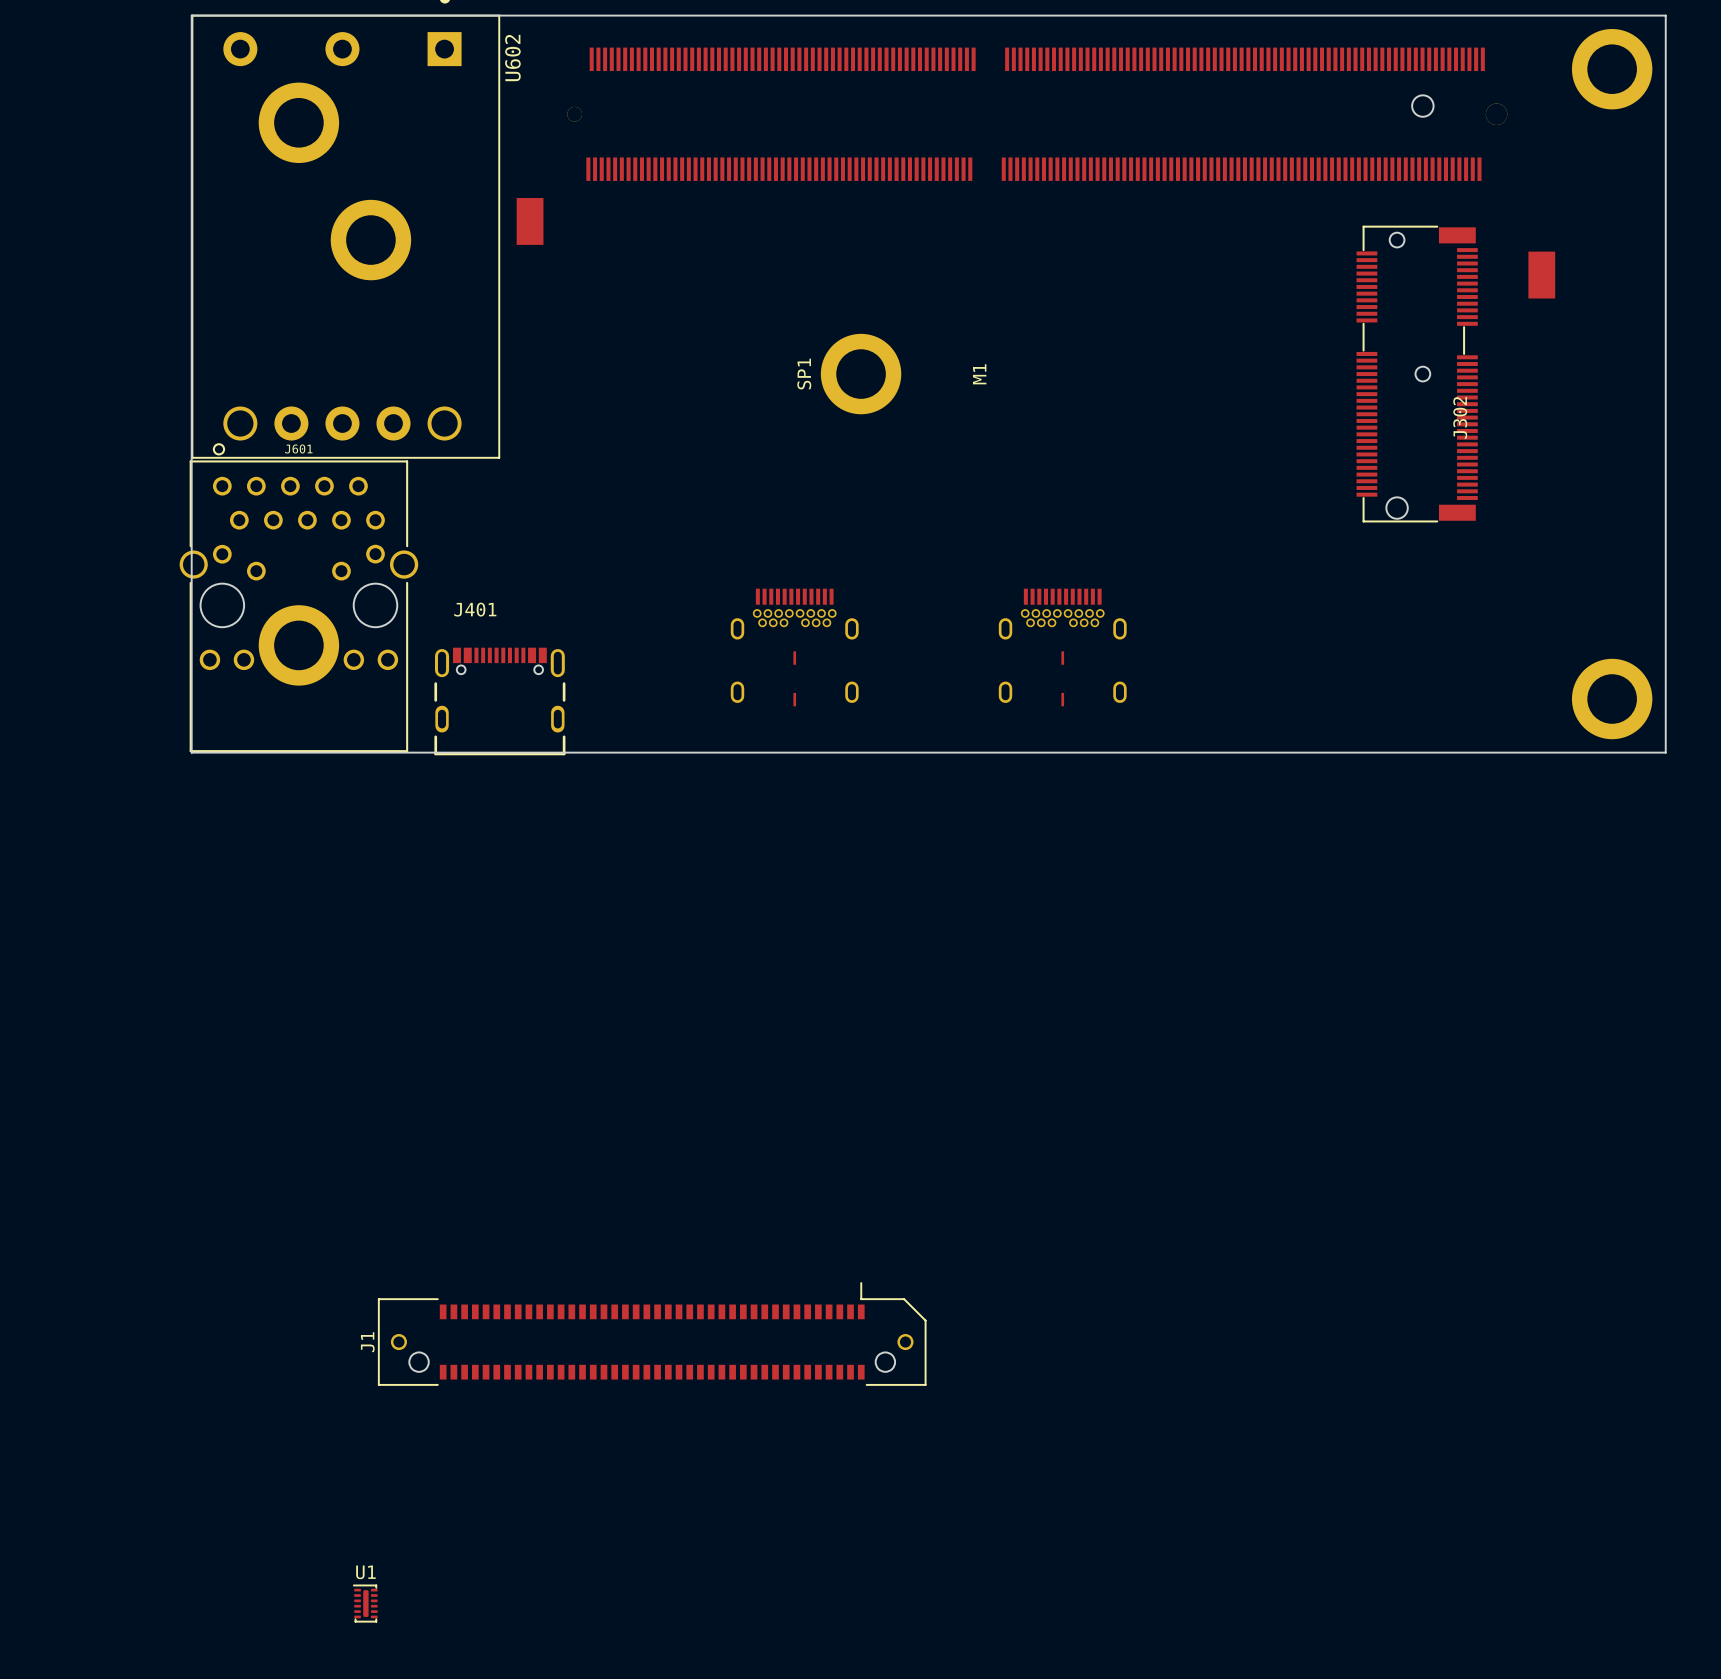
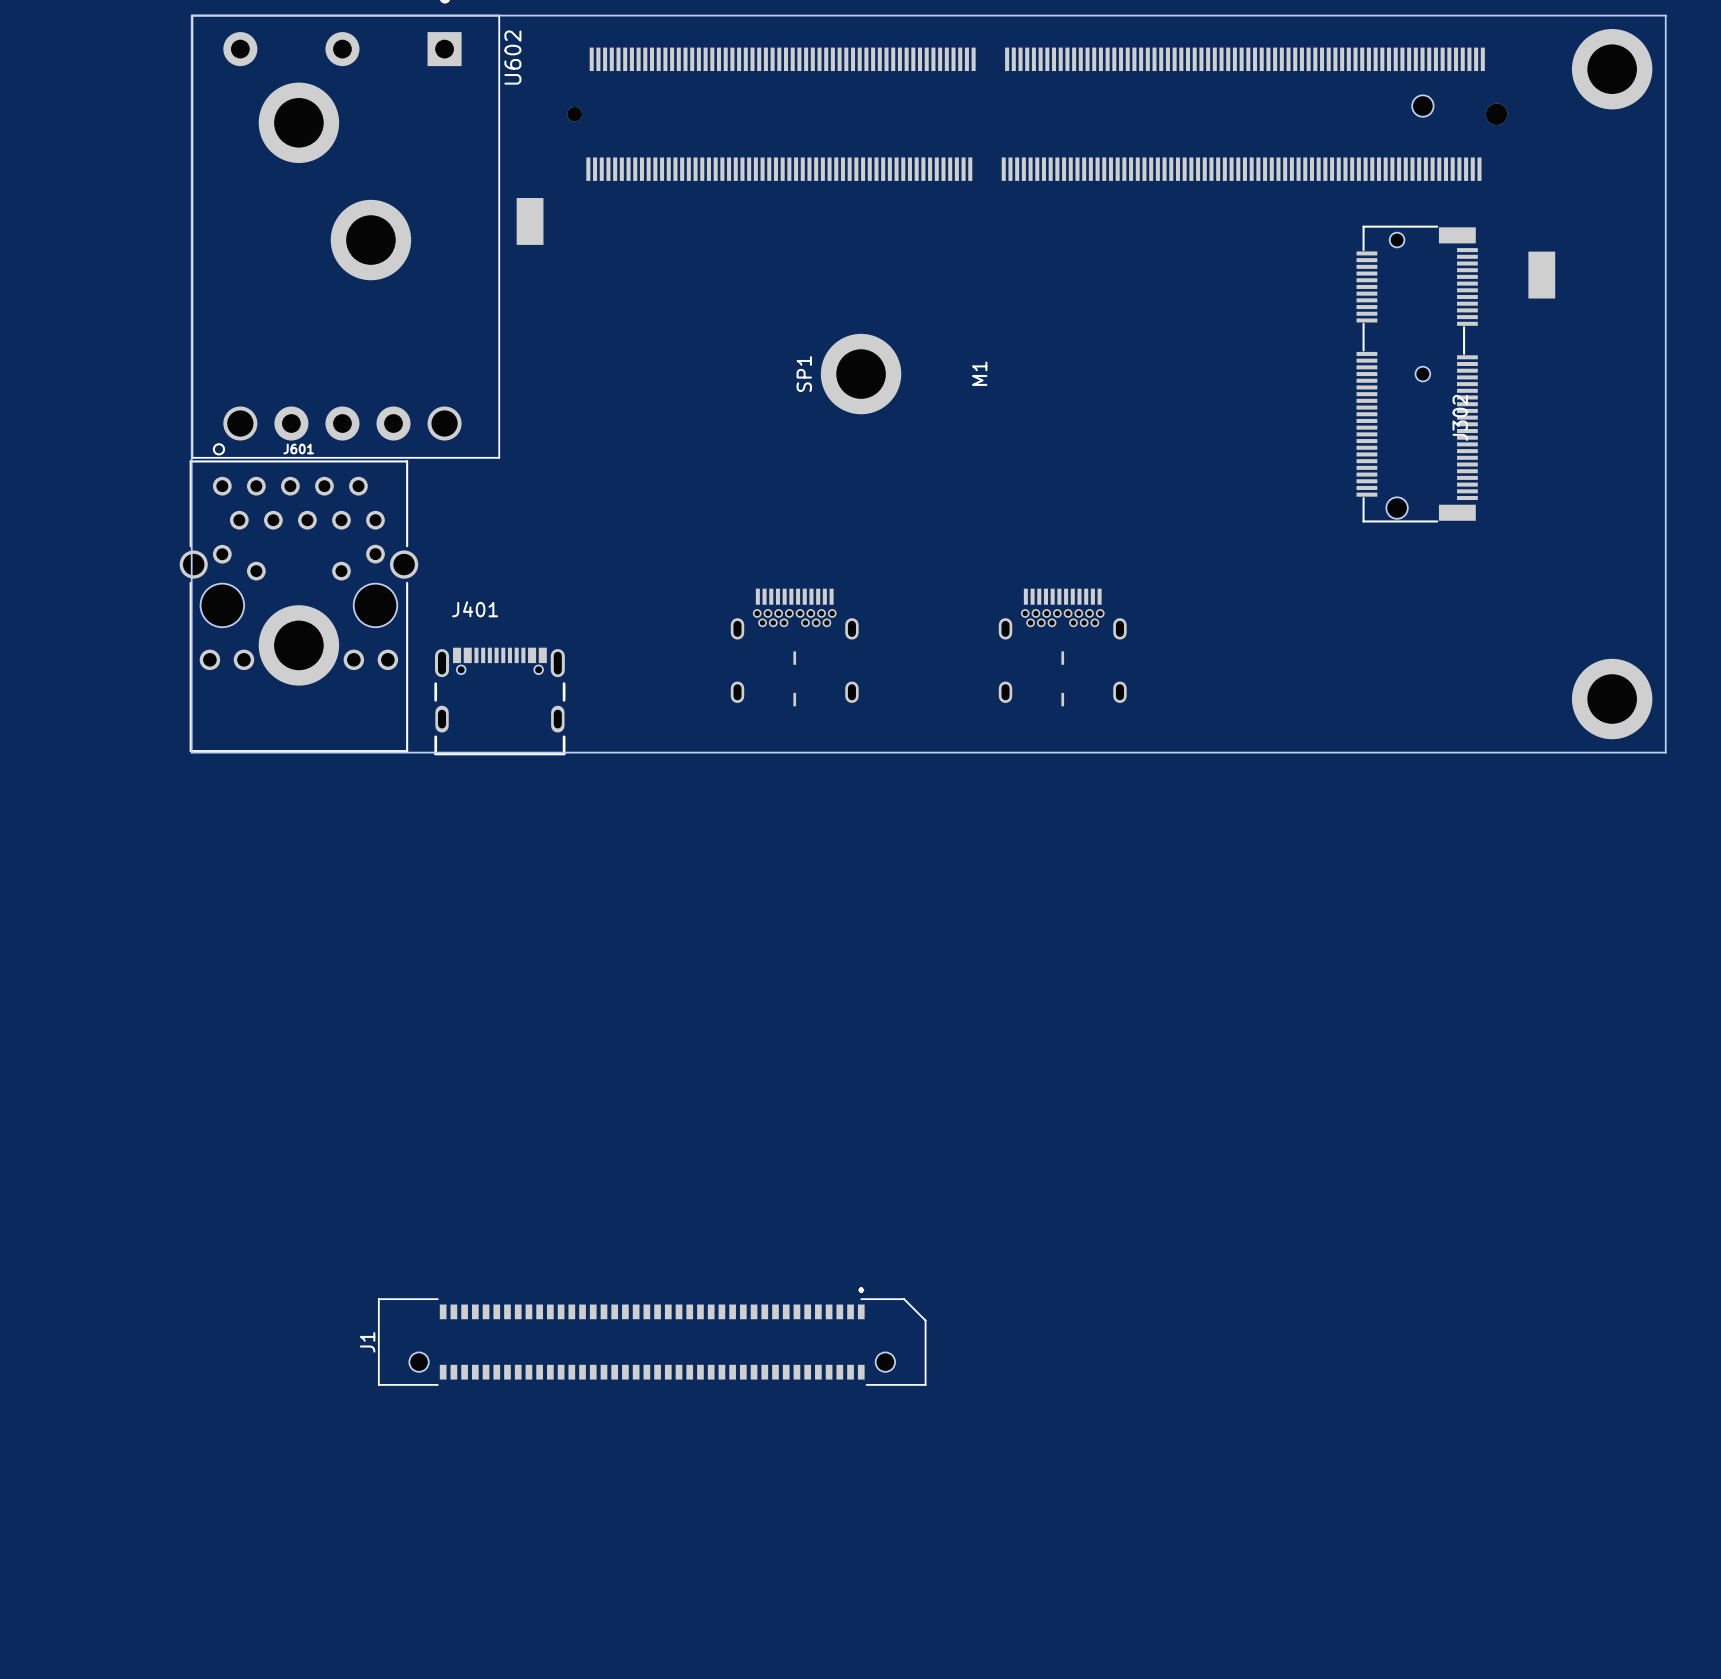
J1 footprint: [378, 1282, 927, 1386] -> [378, 1298, 927, 1386]
U1: (365, 1603) -> none

